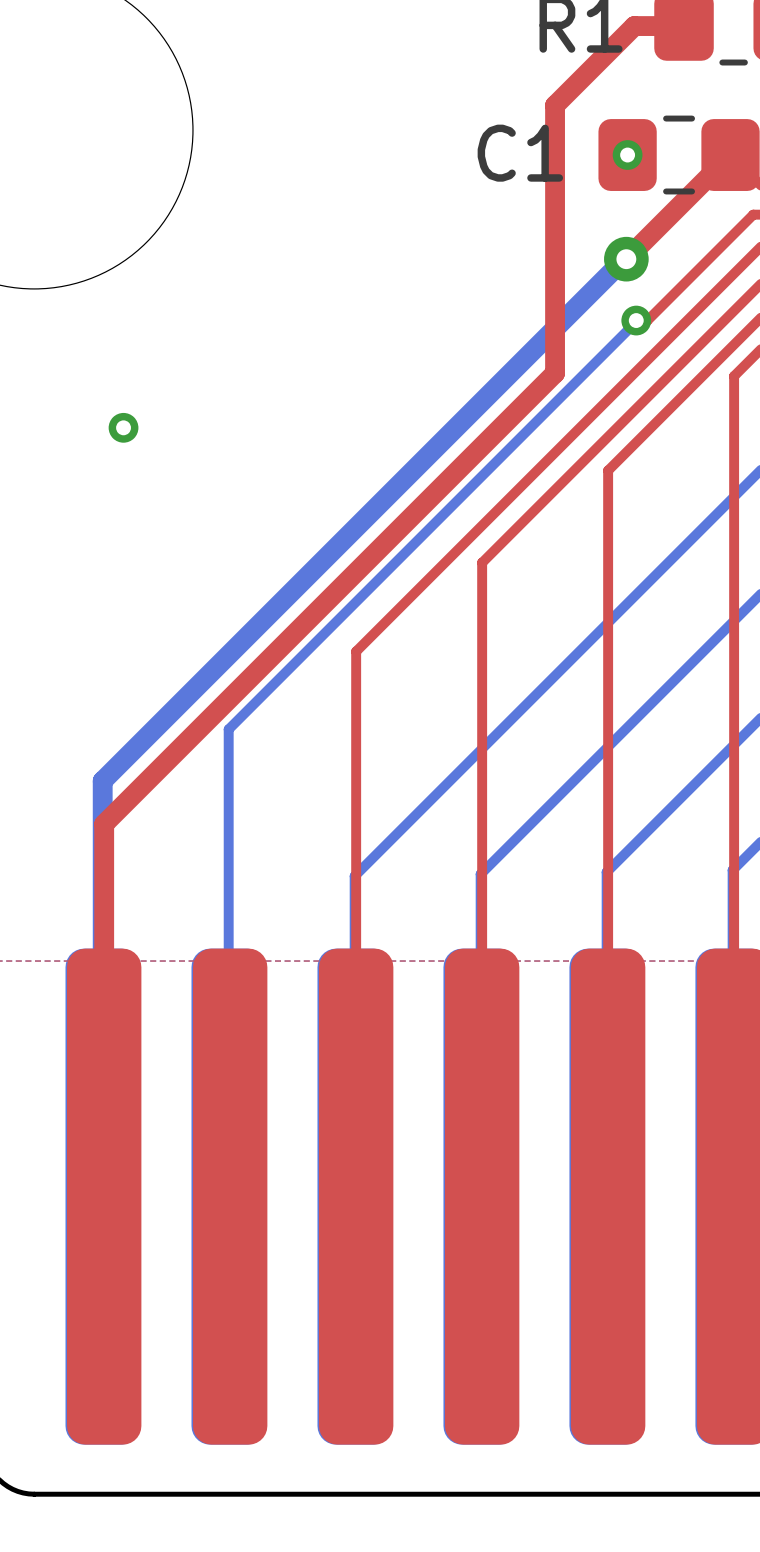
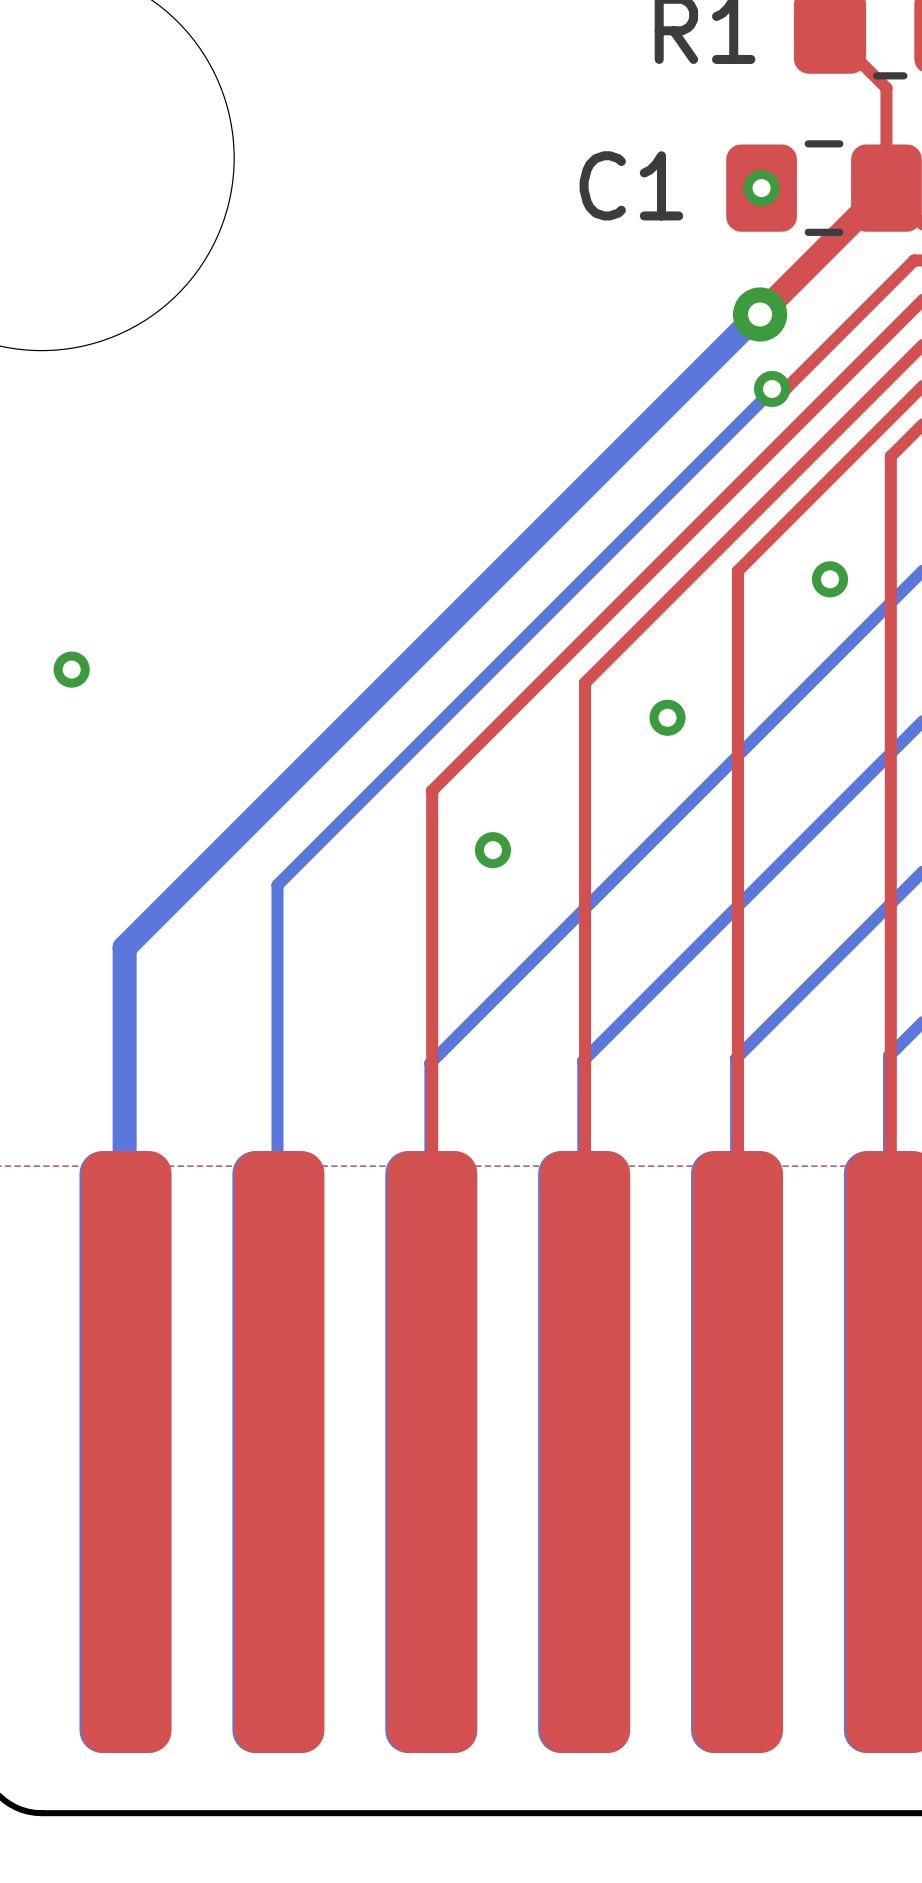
top track: (684, 26) (634, 26) (555, 105) (555, 373) (104, 824) (104, 1196) -> (830, 31) (886, 88) (886, 188)
via position: (123, 427) -> (71, 669)
via: none -> (830, 579)
via: none -> (667, 717)
via: none -> (492, 850)

